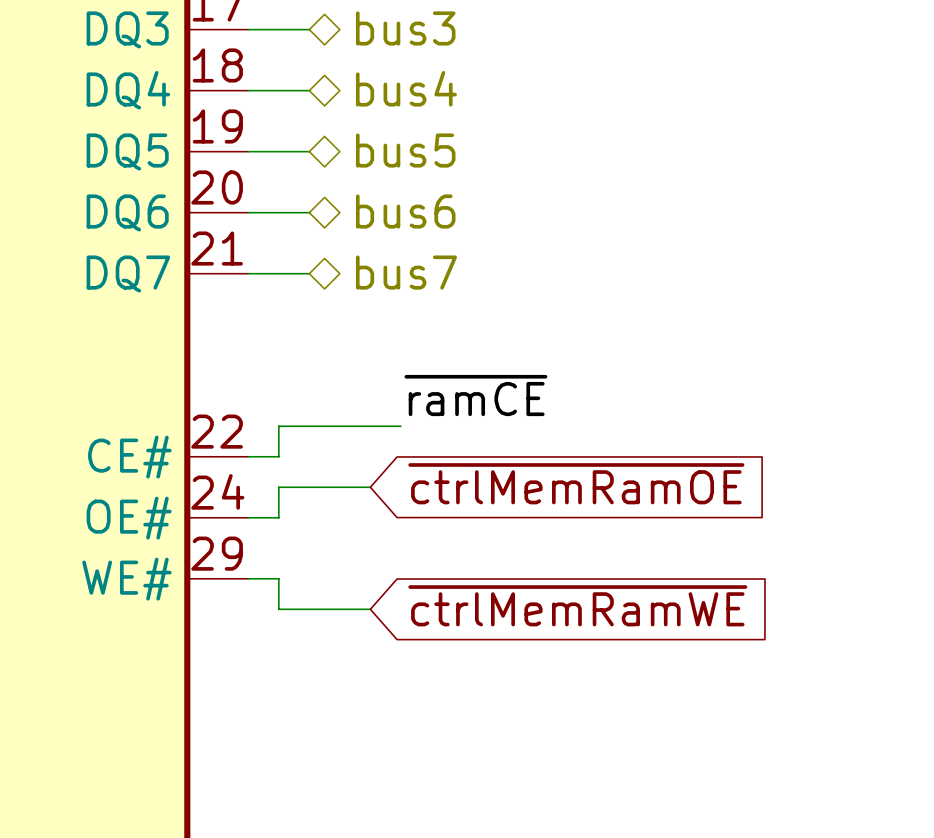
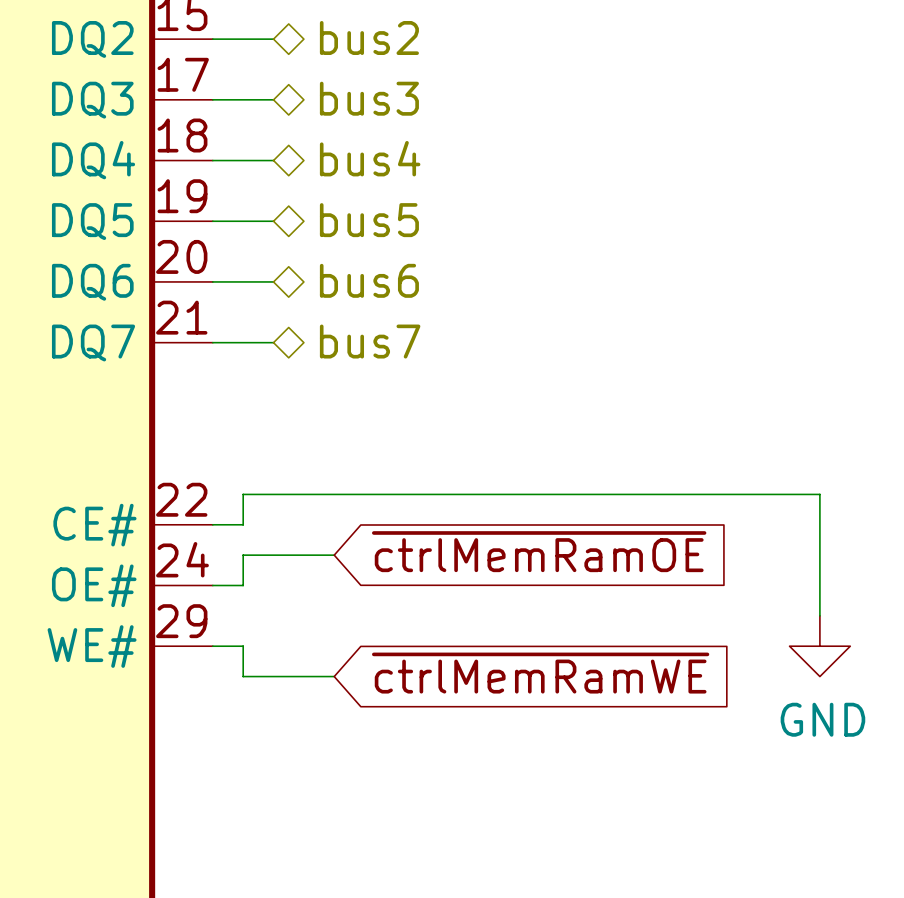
label: ~{ramCE} (475, 395) -> none
wire: none -> (364, 494) (819, 494) (819, 615)
power symbol: none -> GND (819, 646)

